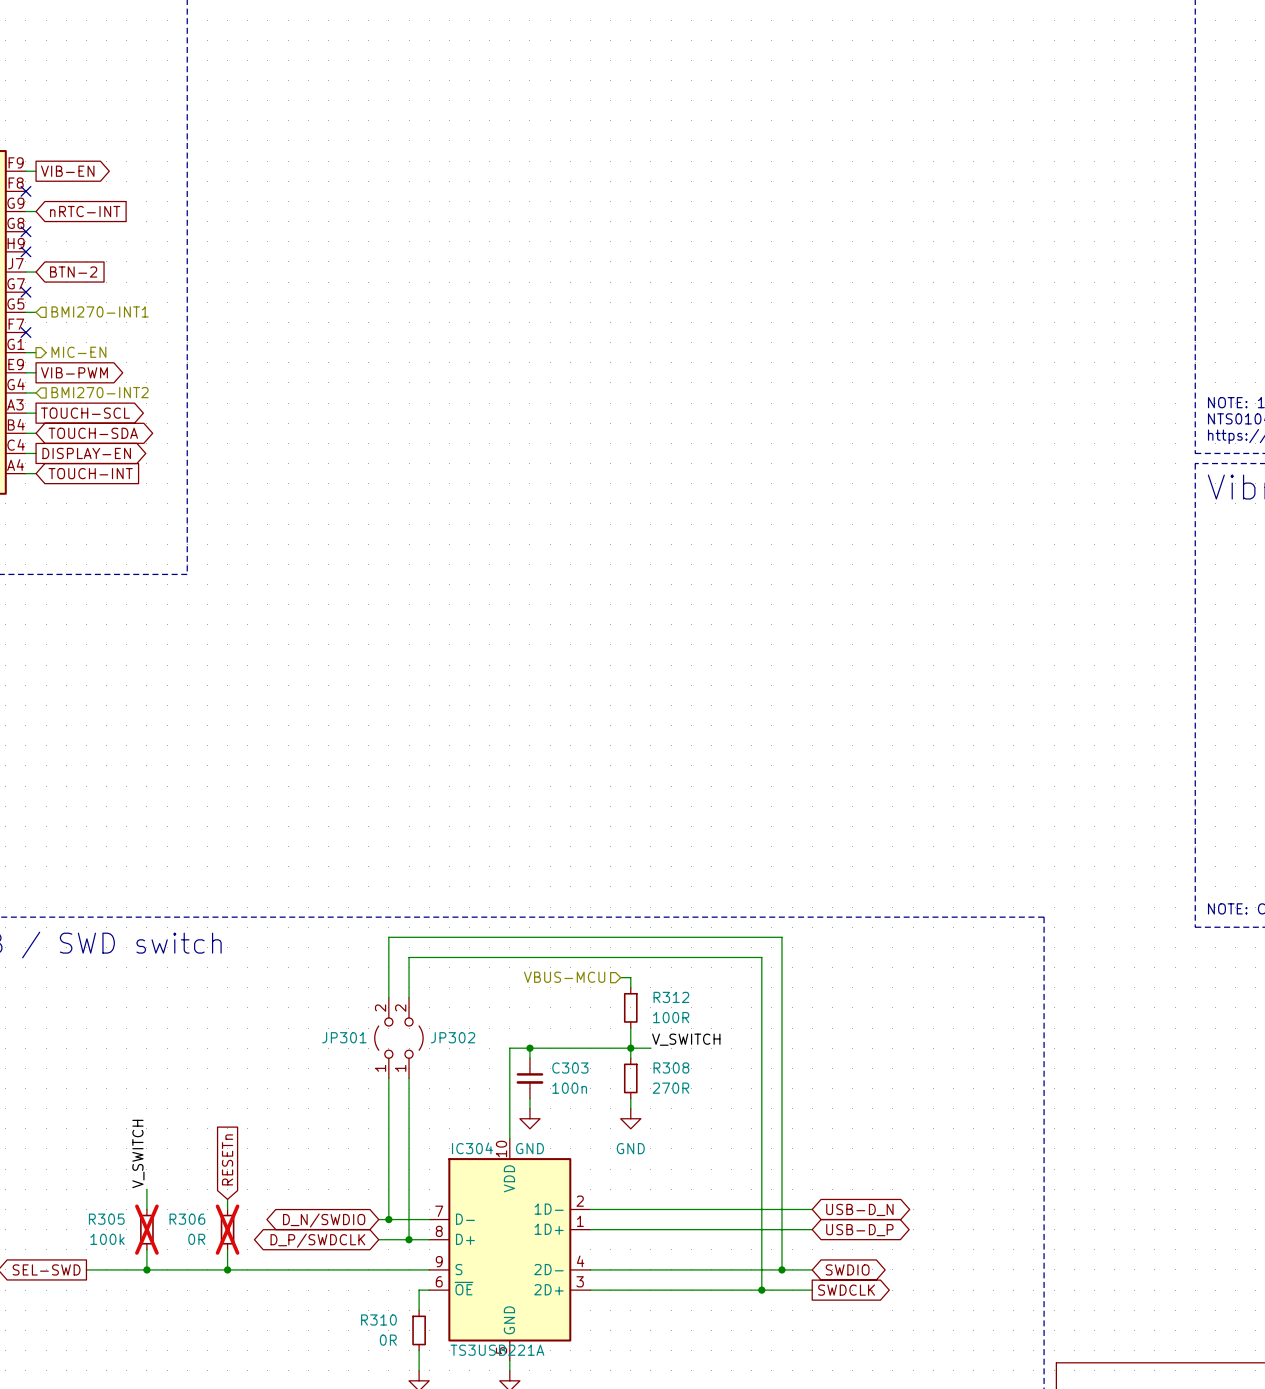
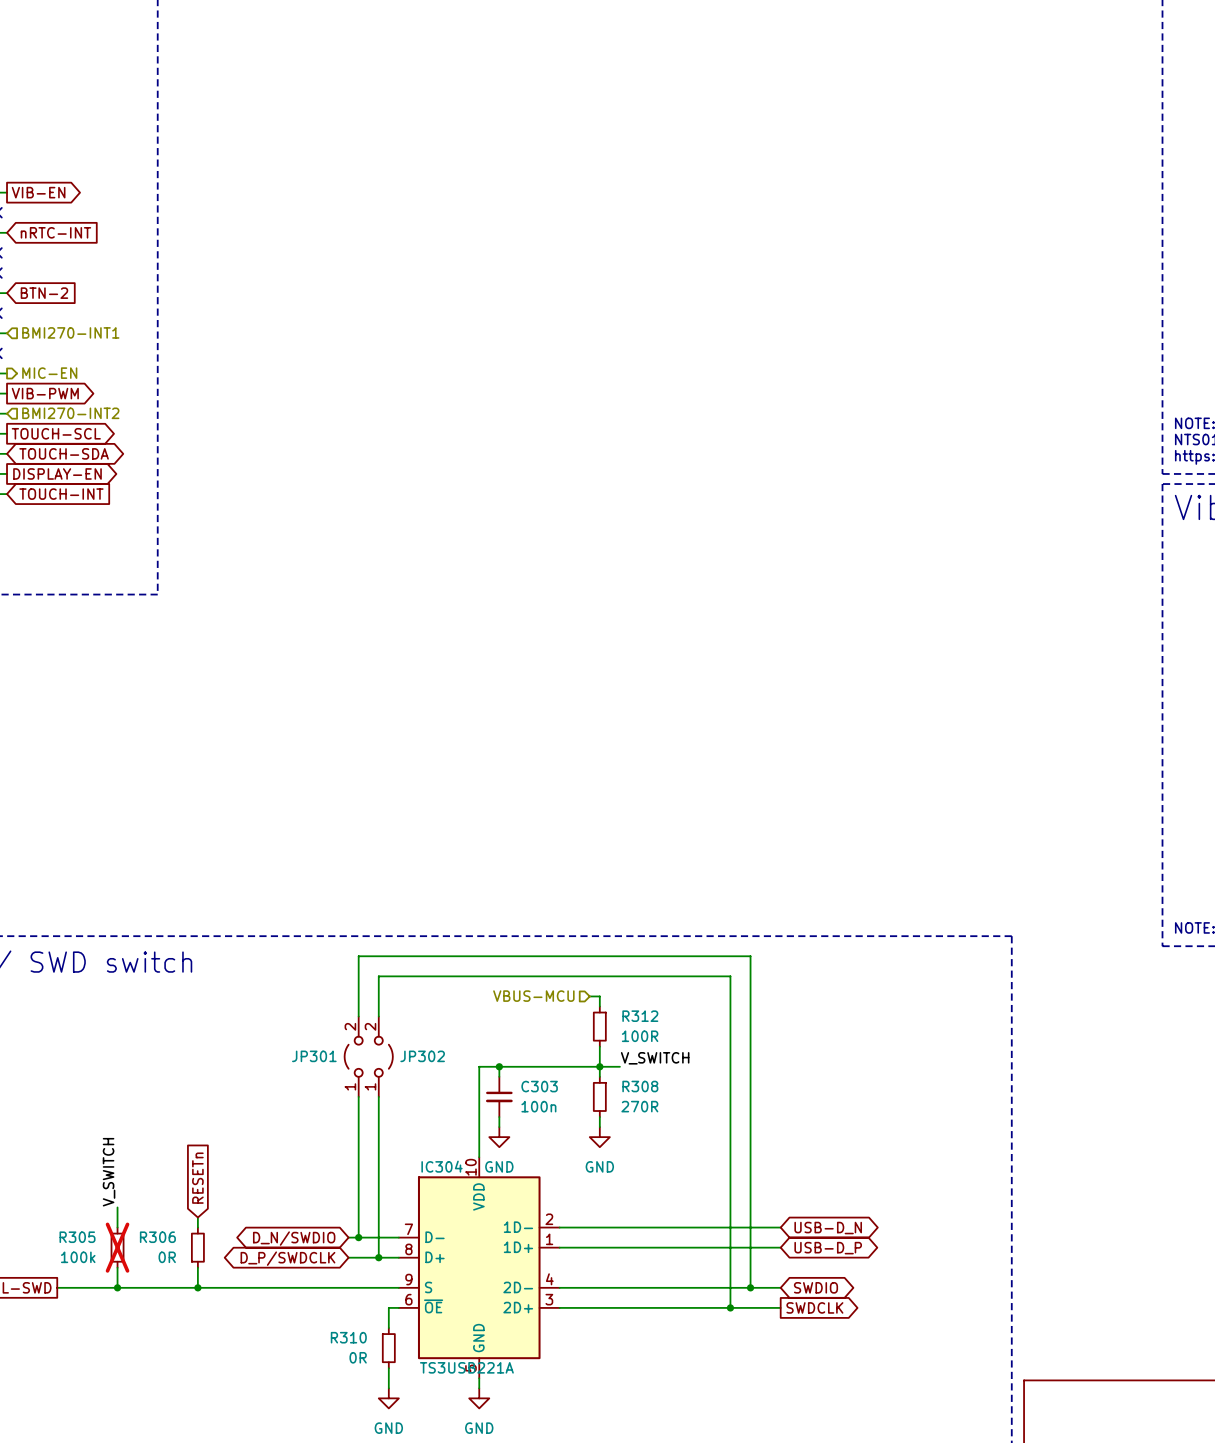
R306 do-not-place cross: (227, 1229) -> none

